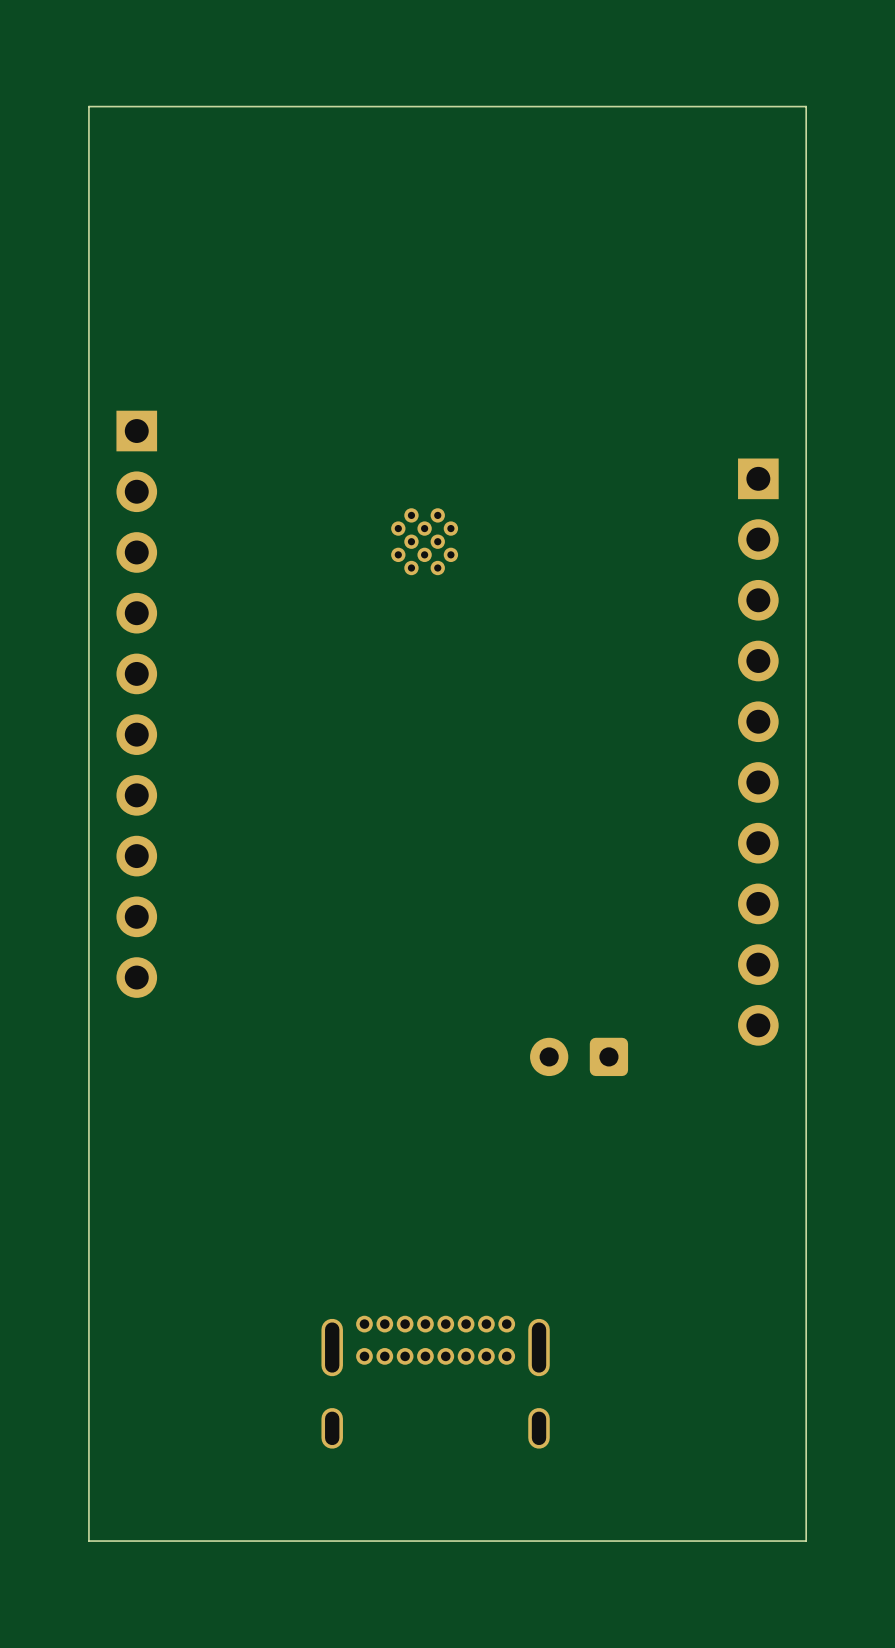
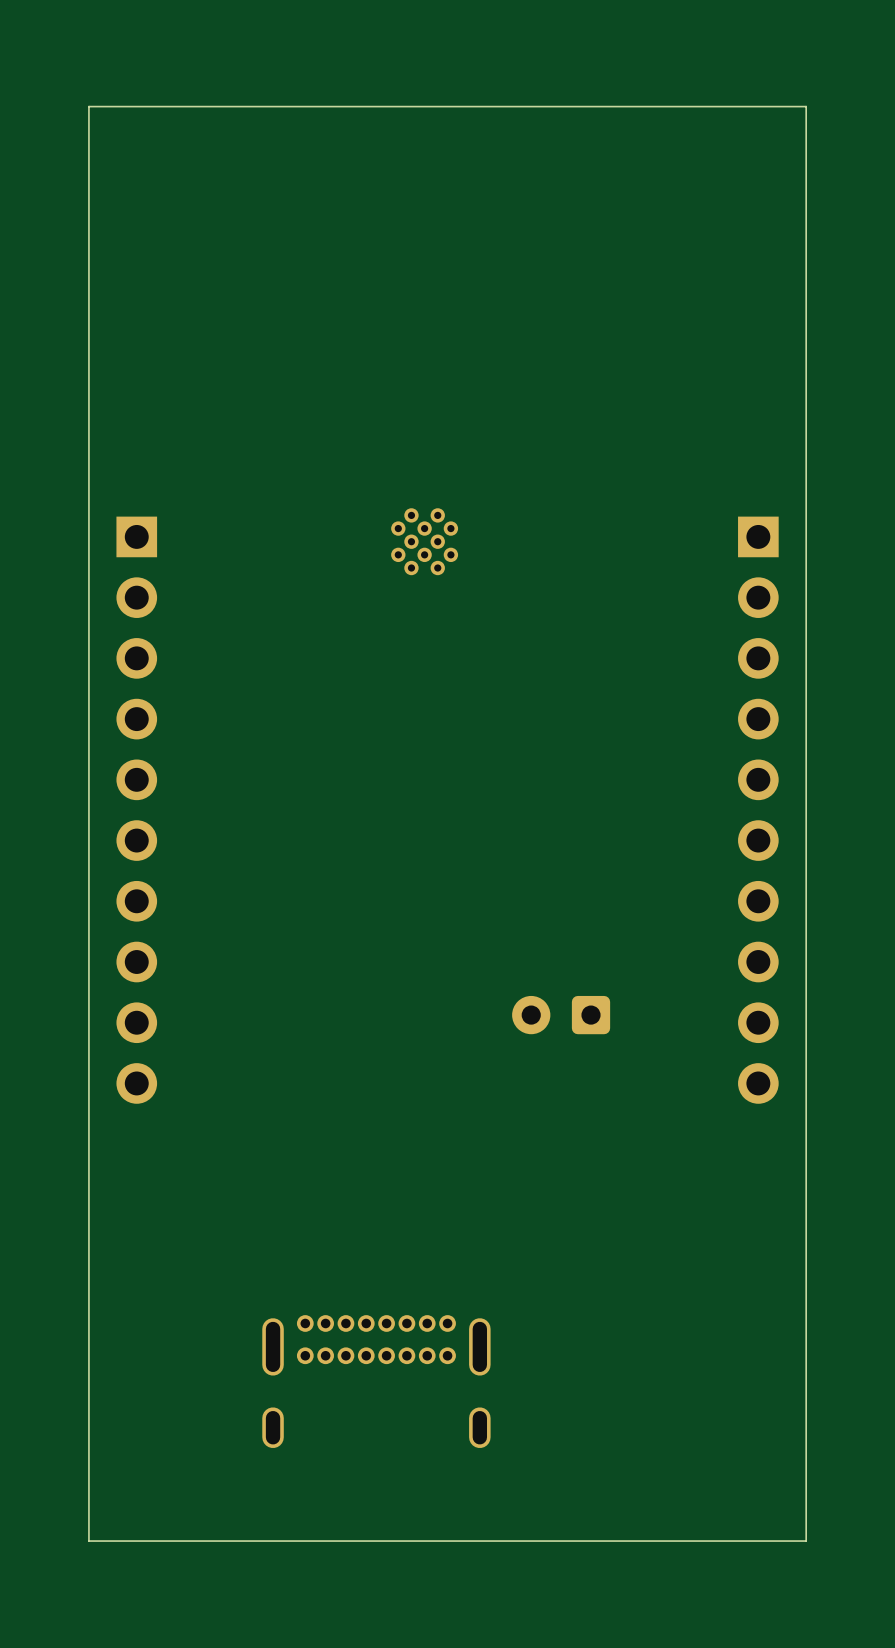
part position: (136, 704) -> (136, 810)
part position: (758, 752) -> (758, 810)
part position: (579, 1056) -> (561, 1015)
part position: (435, 1382) -> (376, 1381)

